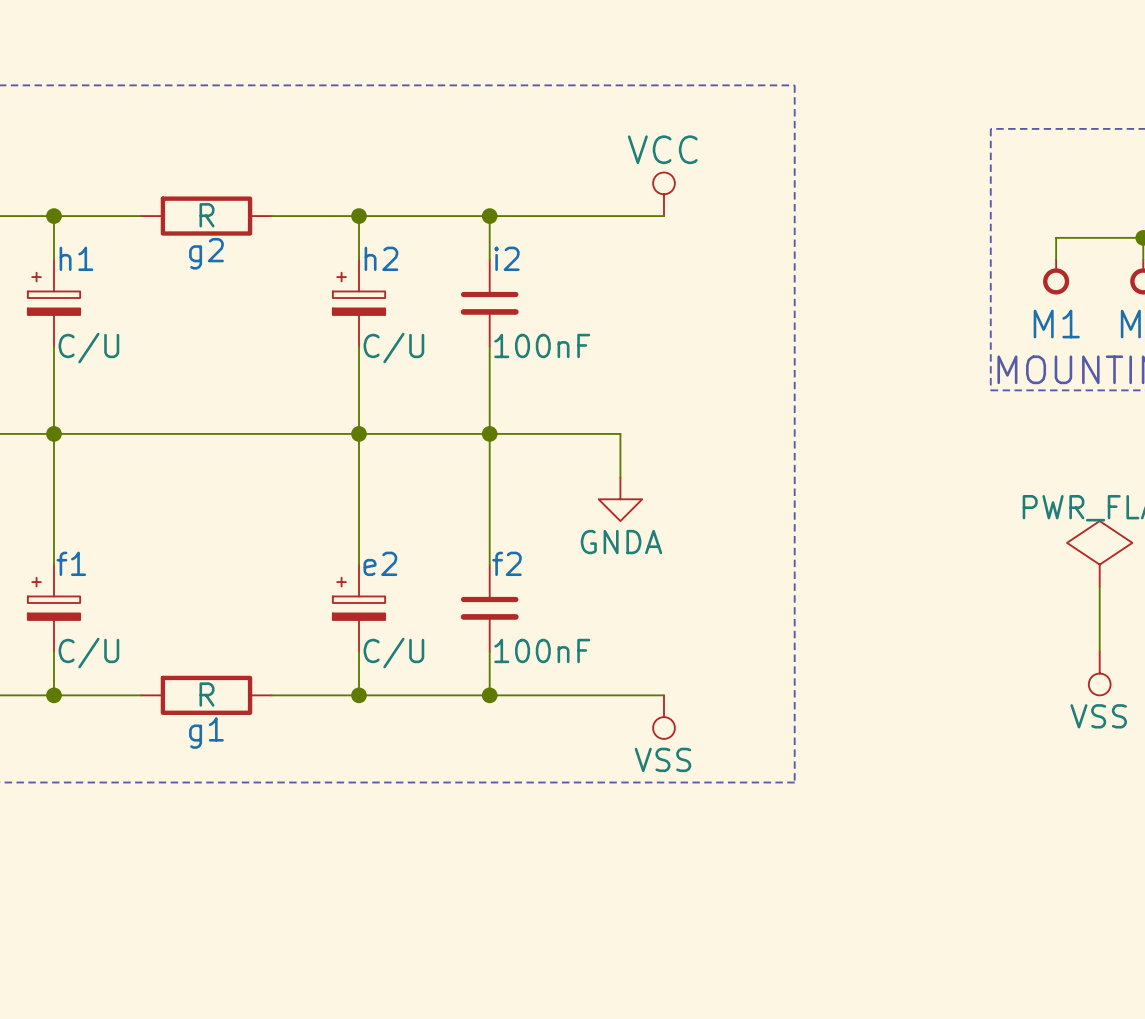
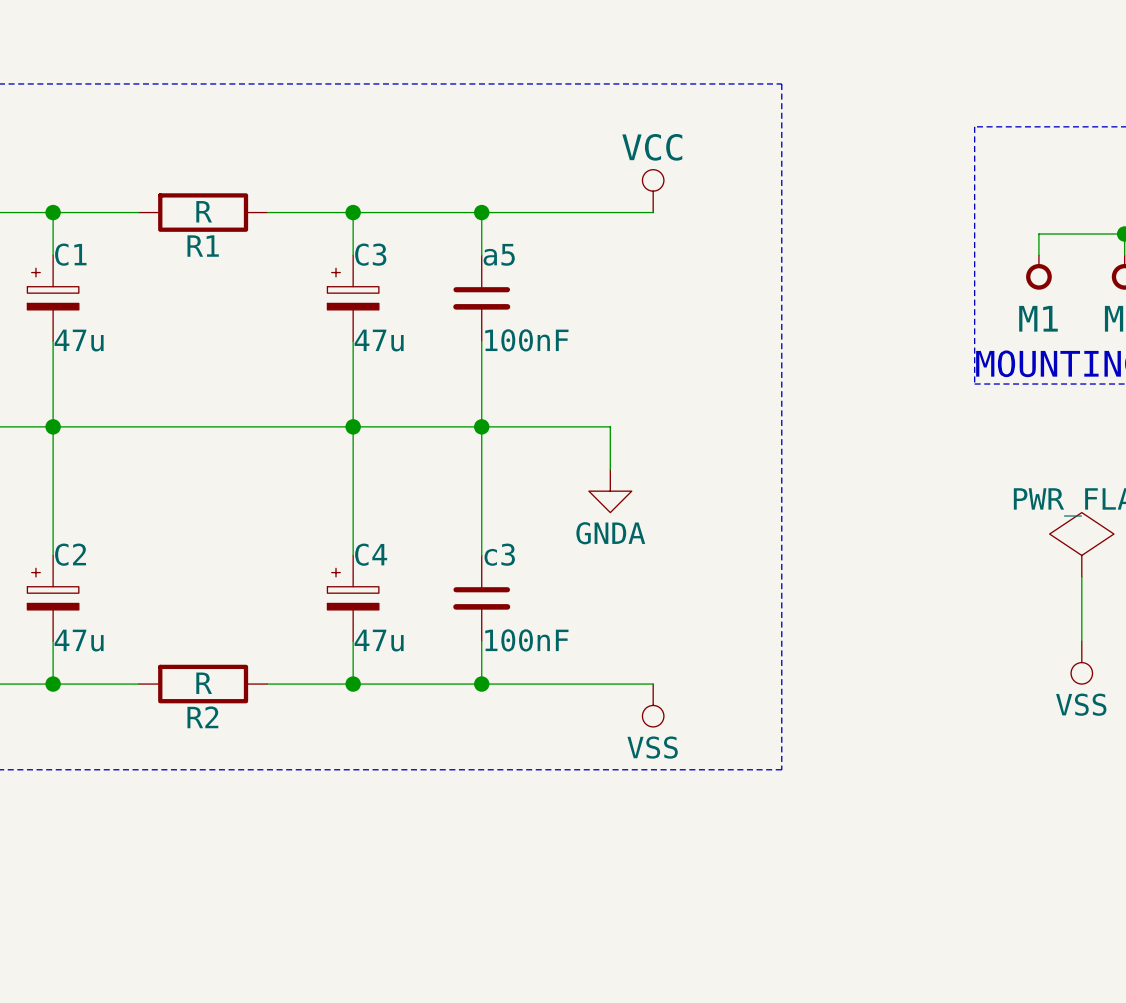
g2 name: g2 (206, 253) -> R1 (203, 246)
h1 name: h1 (76, 258) -> C1 (70, 254)
h2 name: h2 (381, 258) -> C3 (370, 254)
i2 name: i2 (506, 258) -> a5 (499, 254)
h1 value: C/U (88, 348) -> 47u (79, 340)
h2 value: C/U (393, 348) -> 47u (379, 340)
f1 name: f1 (71, 563) -> C2 (70, 554)
e2 name: e2 (380, 563) -> C4 (371, 554)
f2 name: f2 (506, 563) -> c3 (499, 554)
f1 value: C/U (88, 653) -> 47u (79, 640)
e2 value: C/U (393, 653) -> 47u (379, 640)
g1 name: g1 (206, 733) -> R2 (202, 717)

